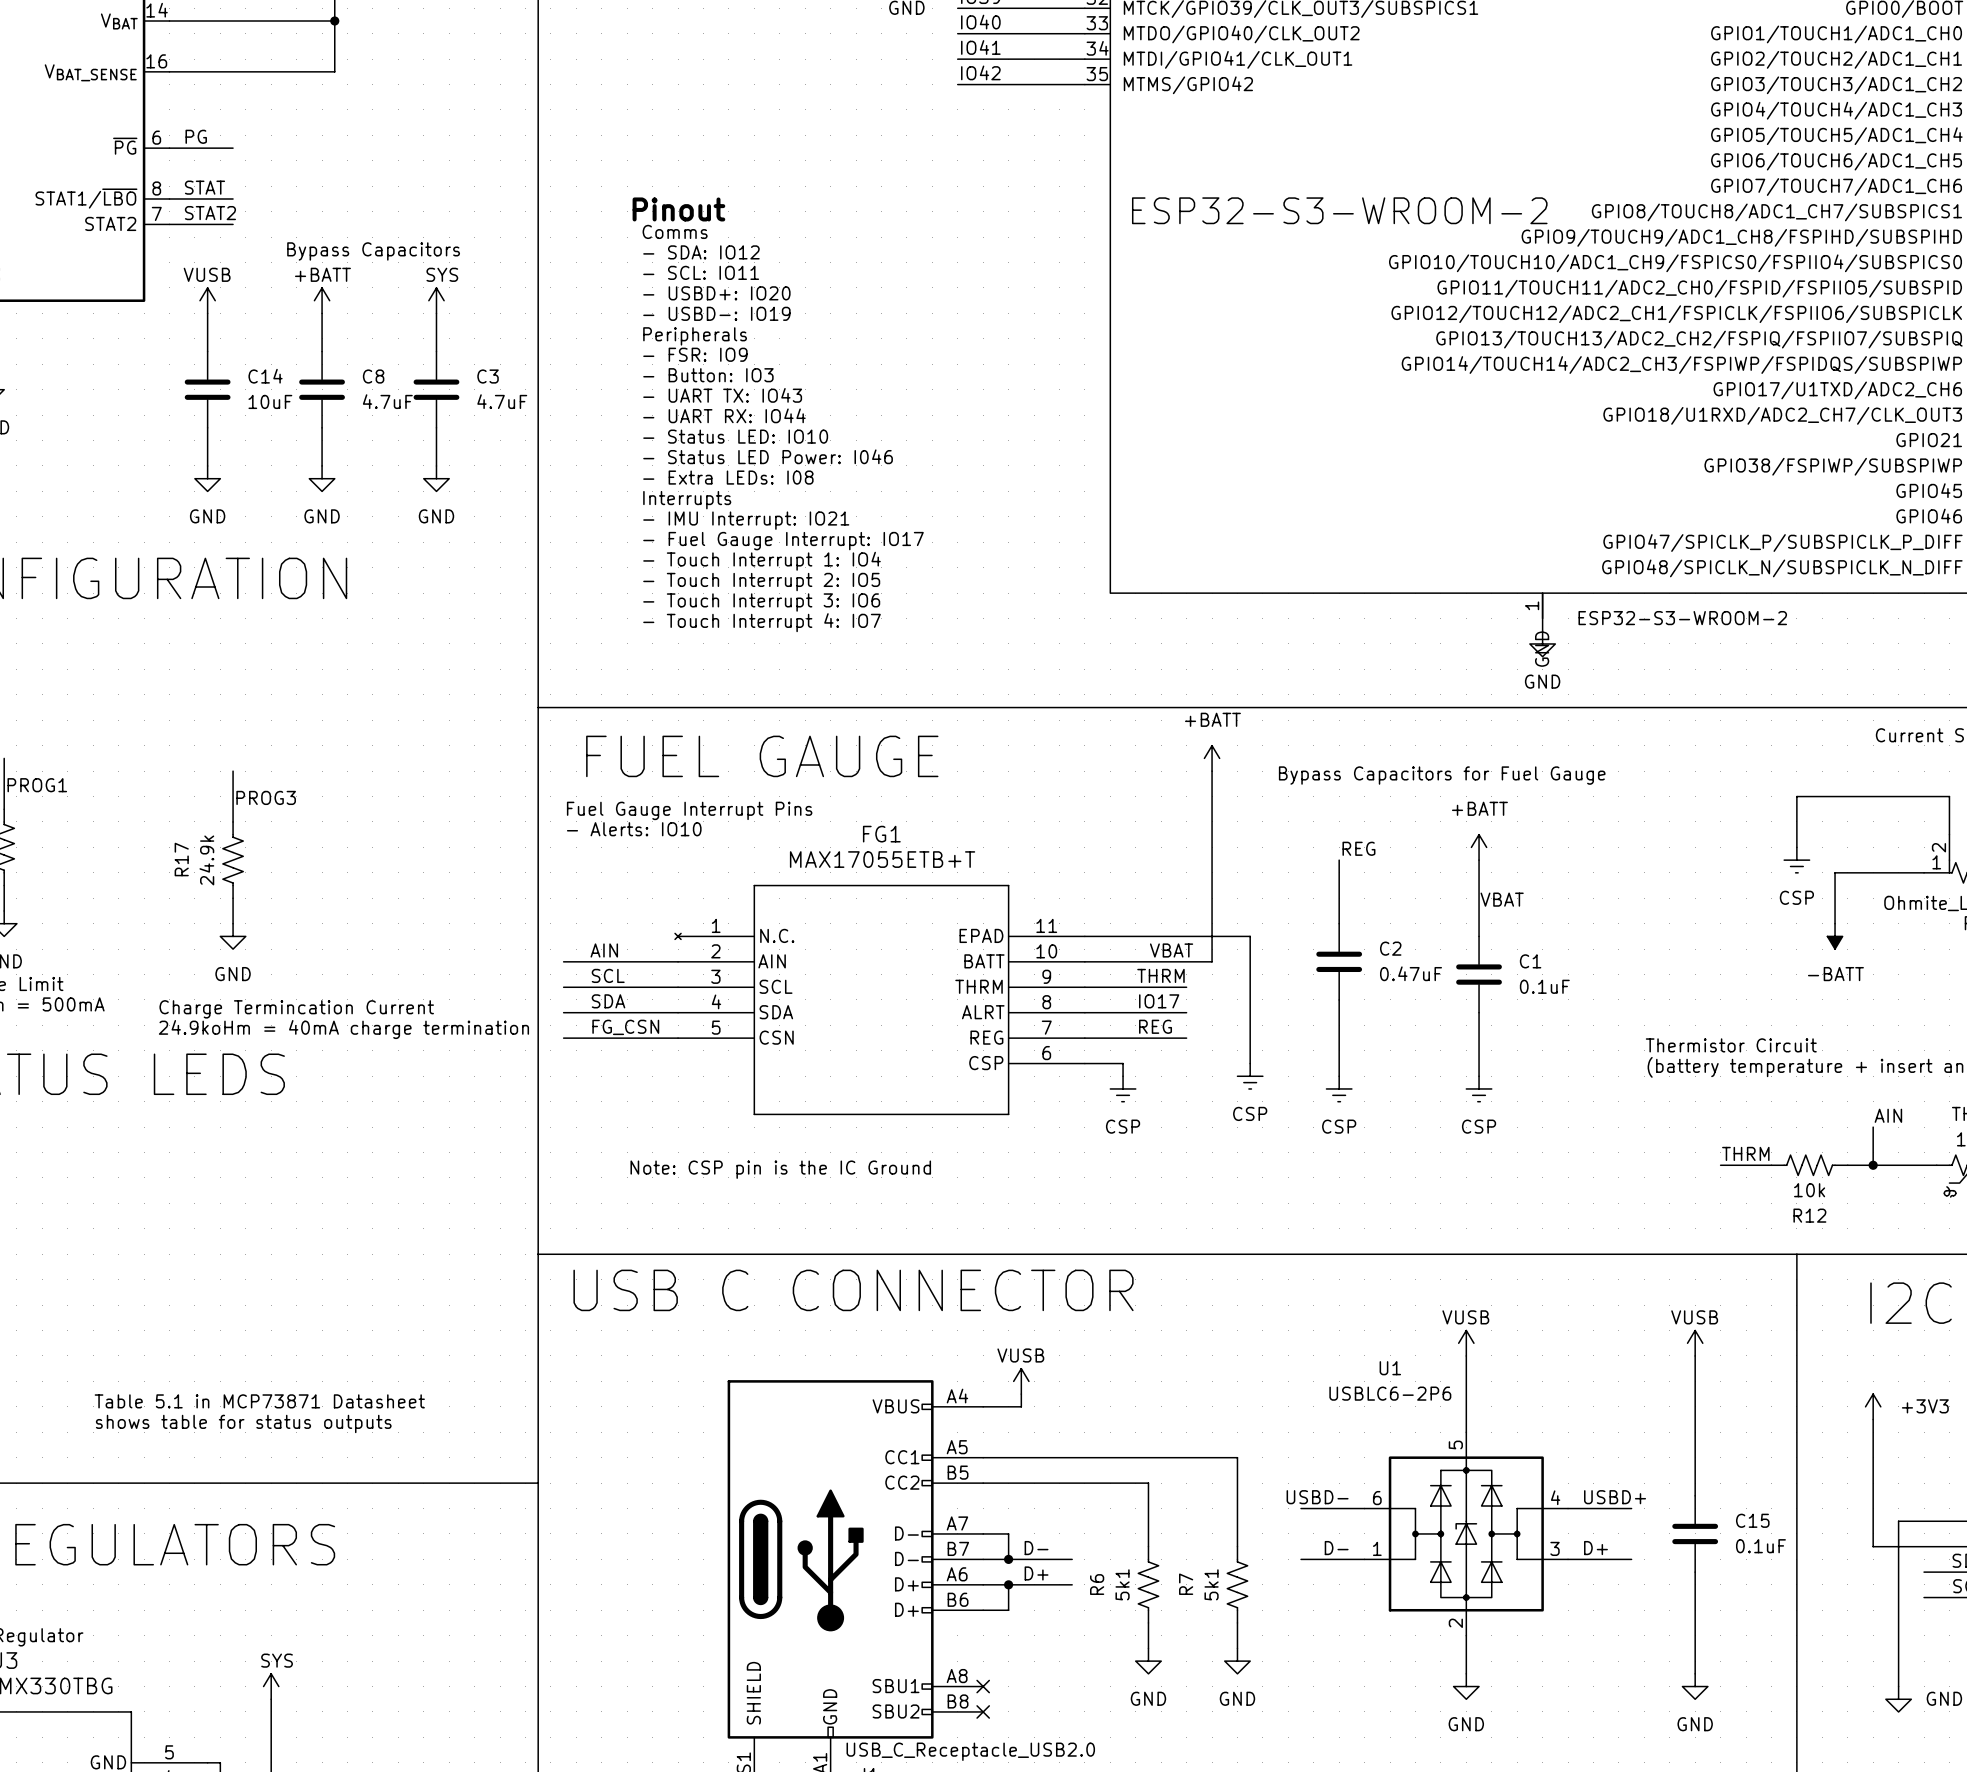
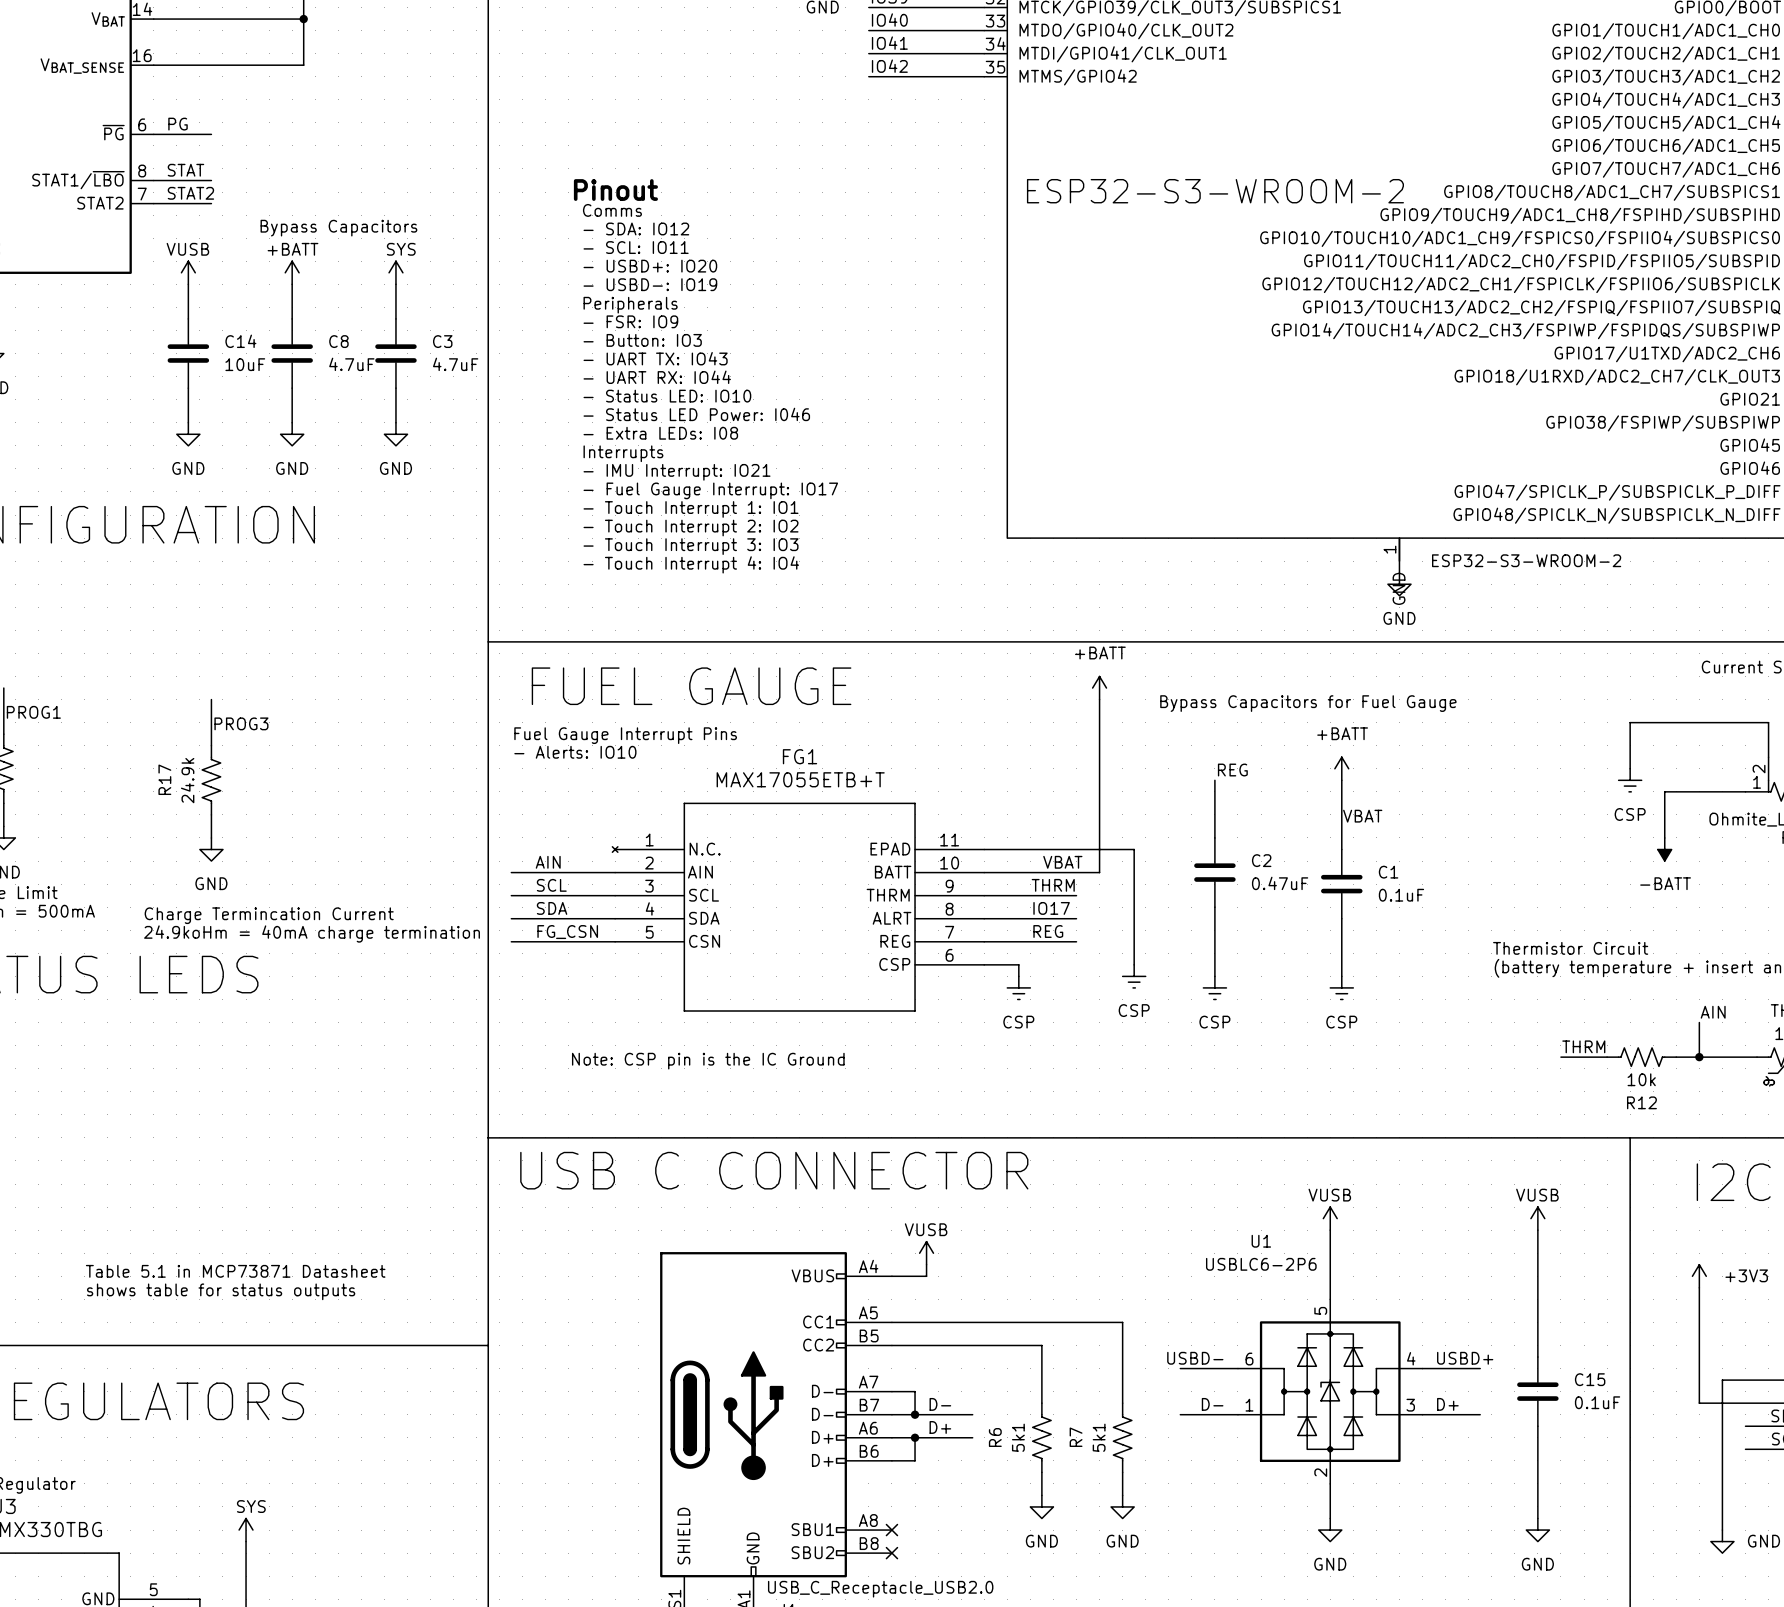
text: - Touch Interrupt 1: IO4 (761, 561) -> - Touch Interrupt 1: IO1 (691, 509)
text: - Touch Interrupt 2: IO5 (761, 582) -> - Touch Interrupt 2: IO2 (691, 528)
text: - Touch Interrupt 3: IO6 (761, 602) -> - Touch Interrupt 3: IO3 (691, 546)
text: - Touch Interrupt 4: IO7 (761, 622) -> - Touch Interrupt 4: IO4 (691, 564)

